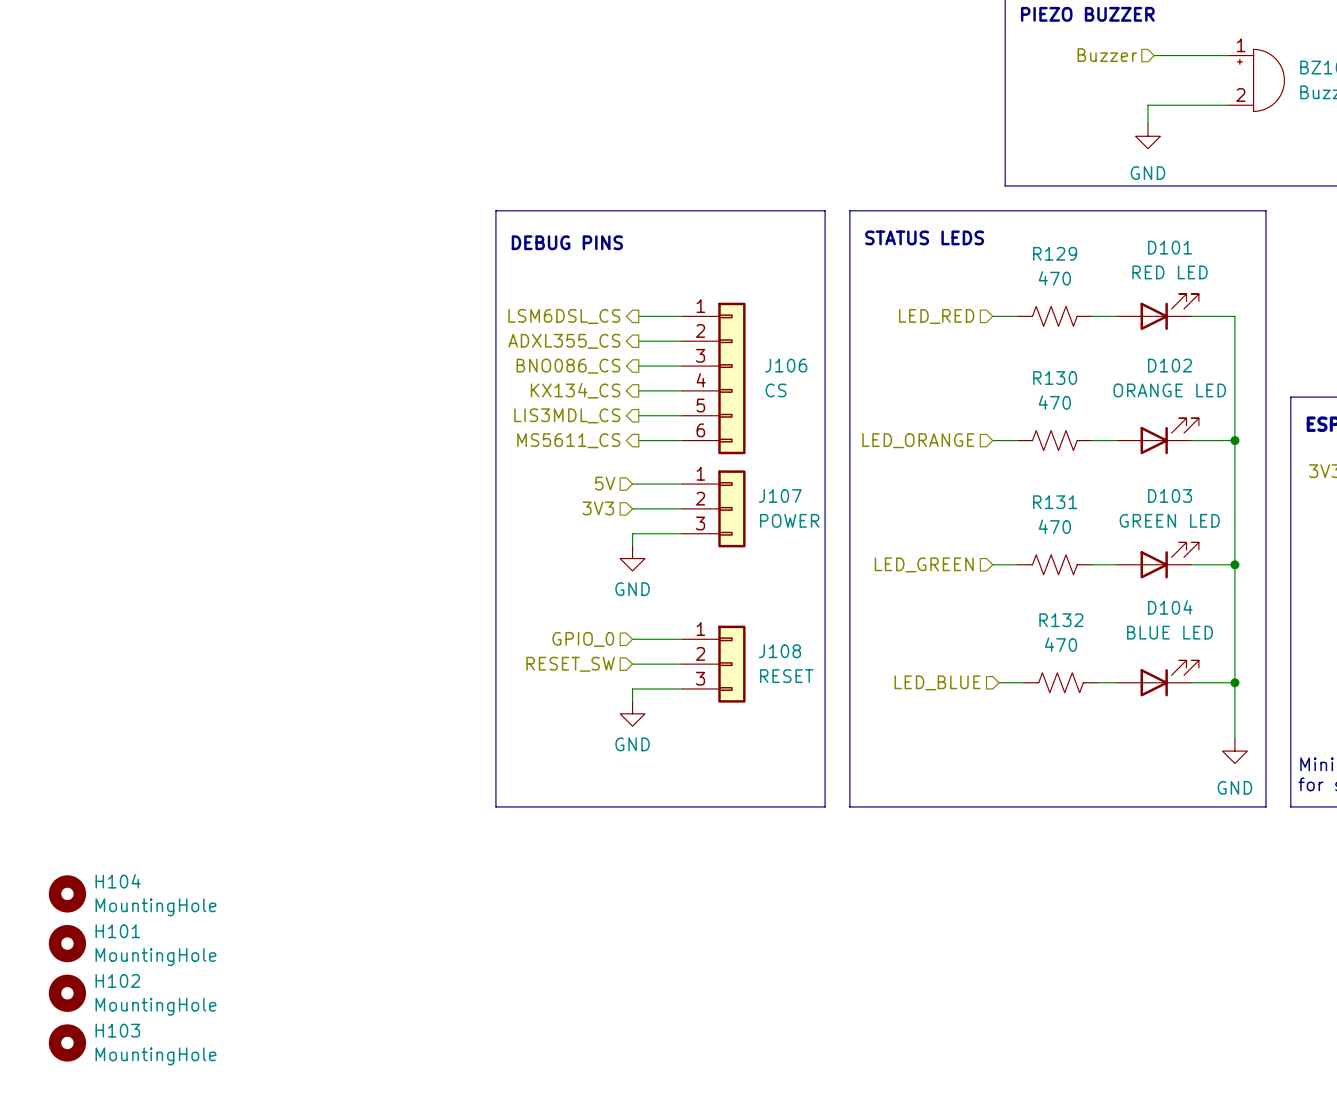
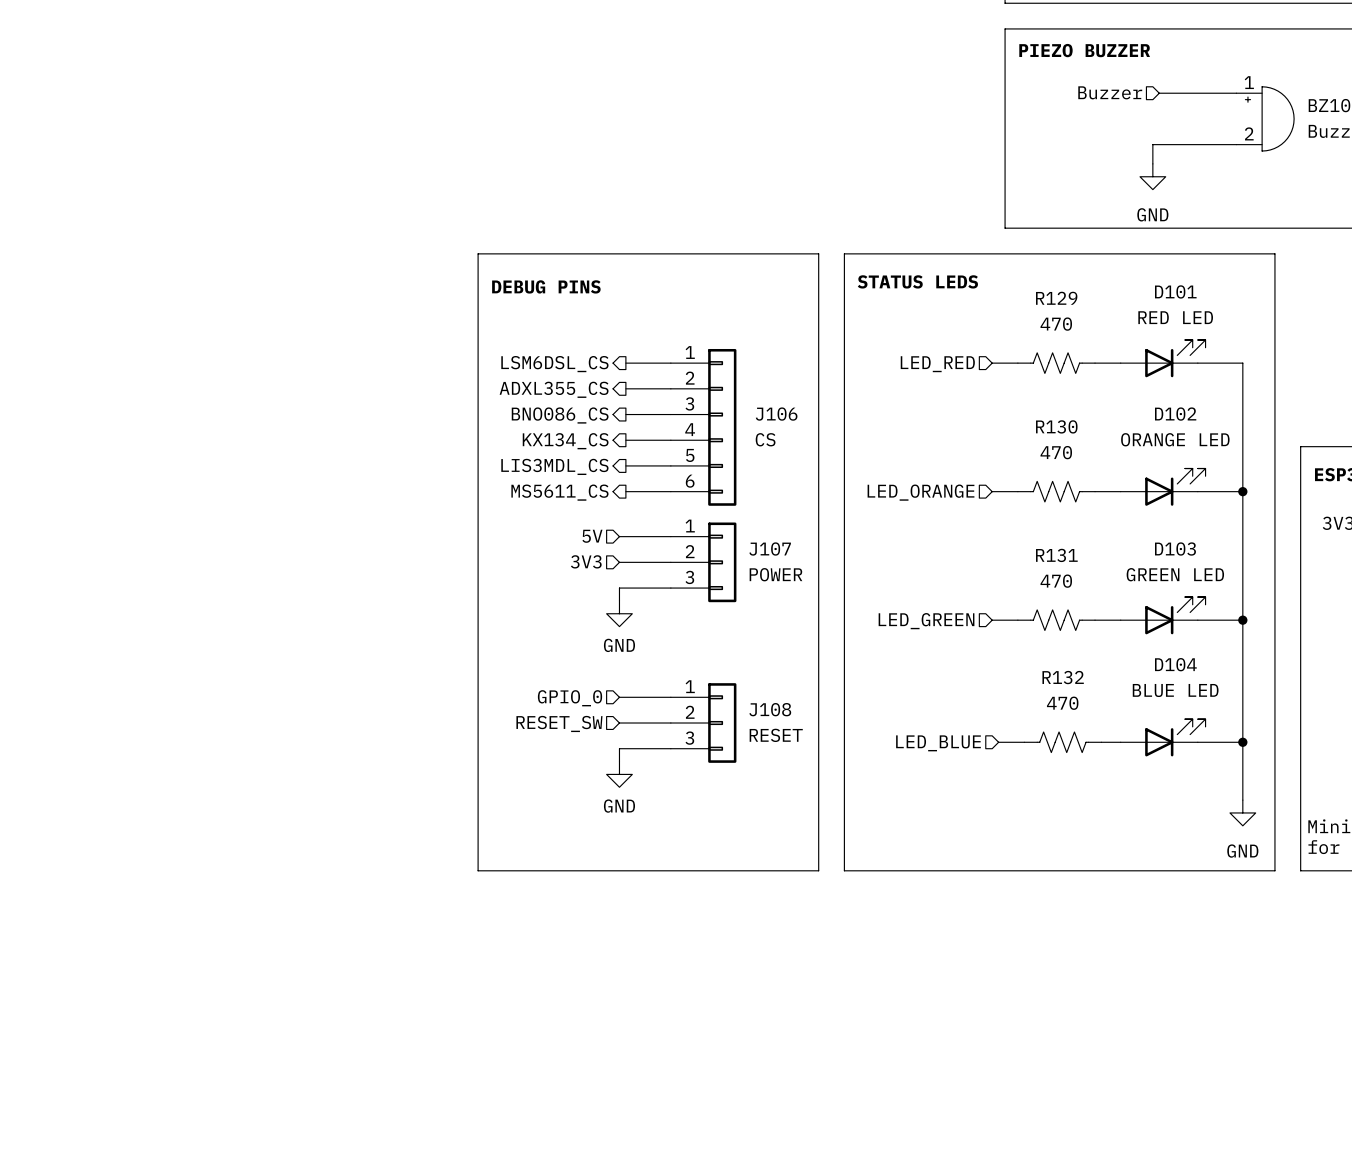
H104: MountingHole (67, 893) -> none
H101: MountingHole (67, 943) -> none
H102: MountingHole (67, 993) -> none
H103: MountingHole (67, 1042) -> none

